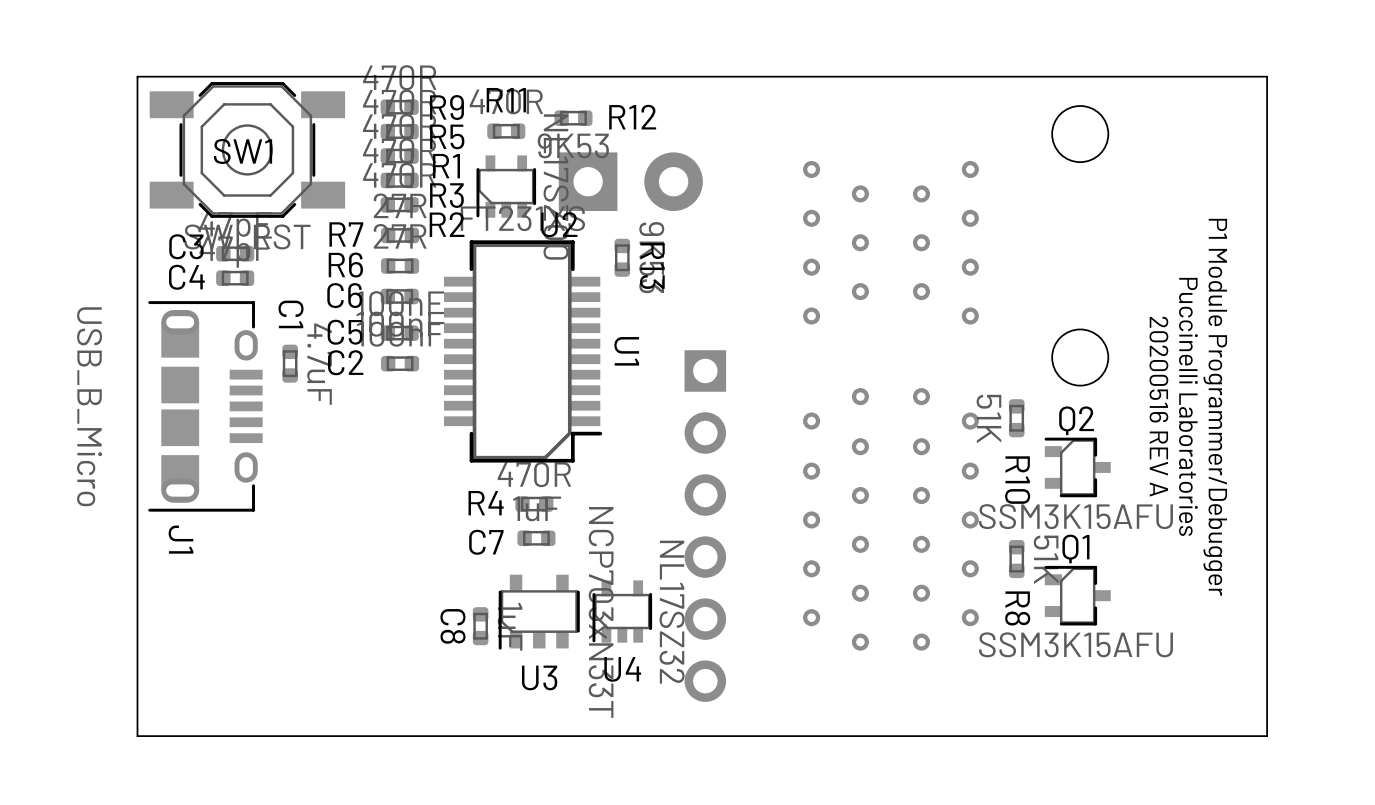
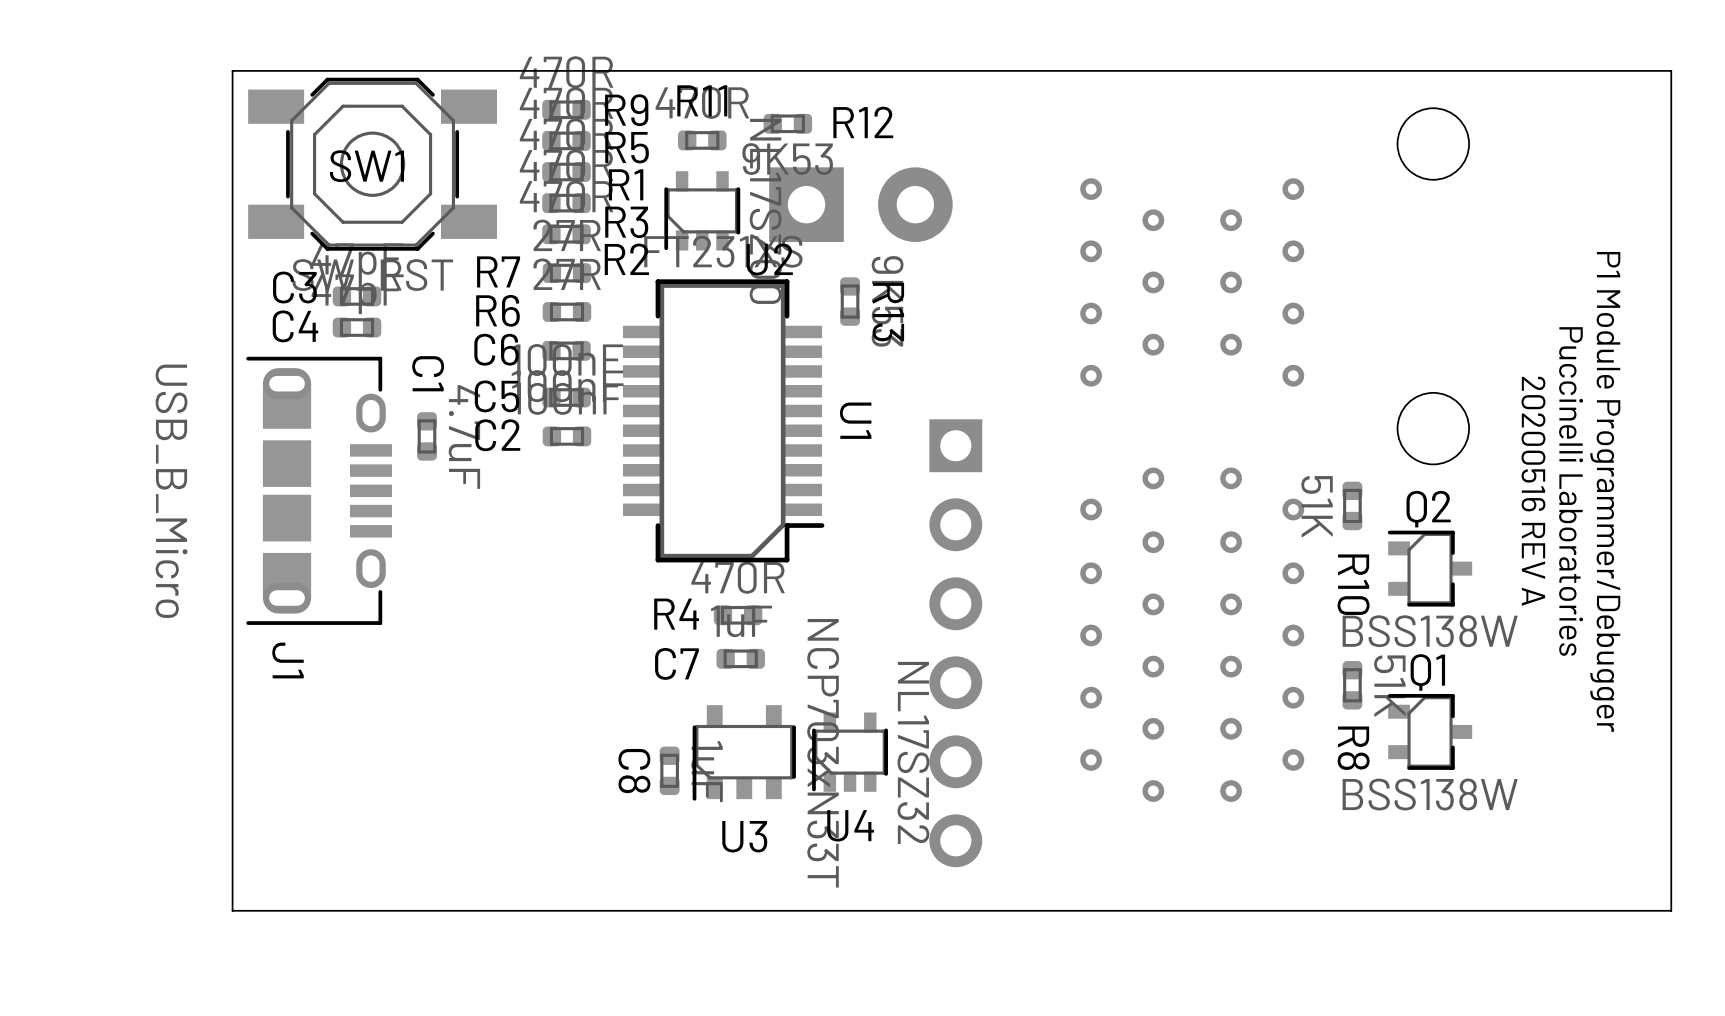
Q2 value: SSM3K15AFU (1075, 516) -> BSS138W (1430, 631)
Q1 value: SSM3K15AFU (1075, 644) -> BSS138W (1430, 794)

